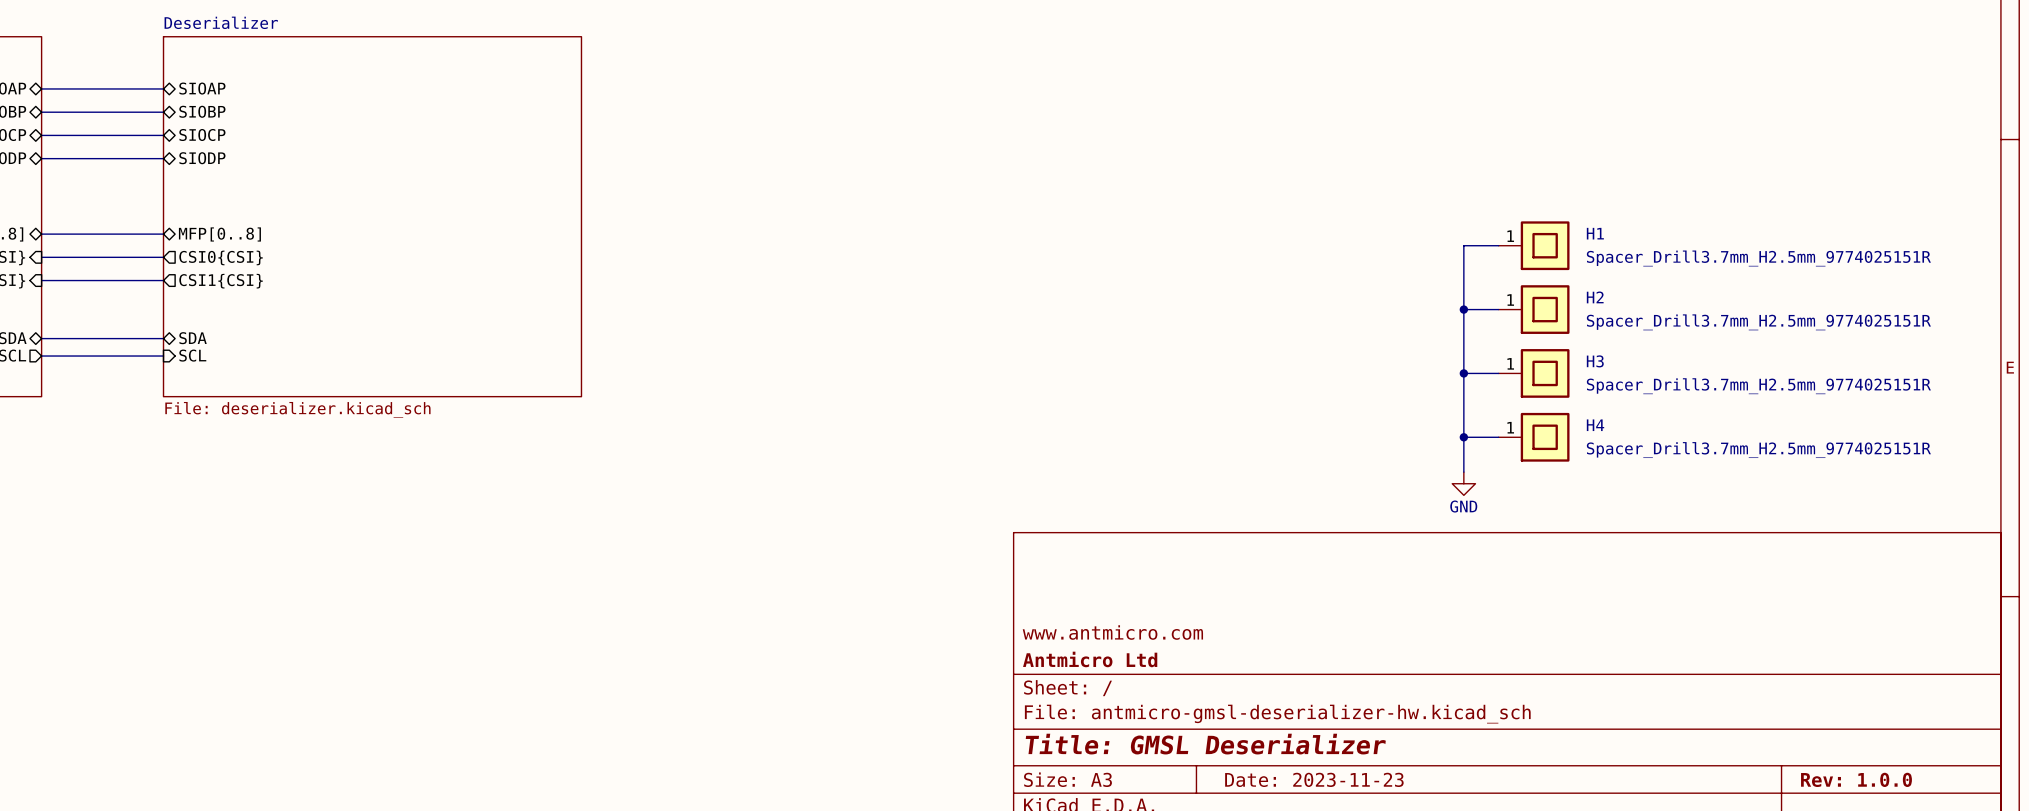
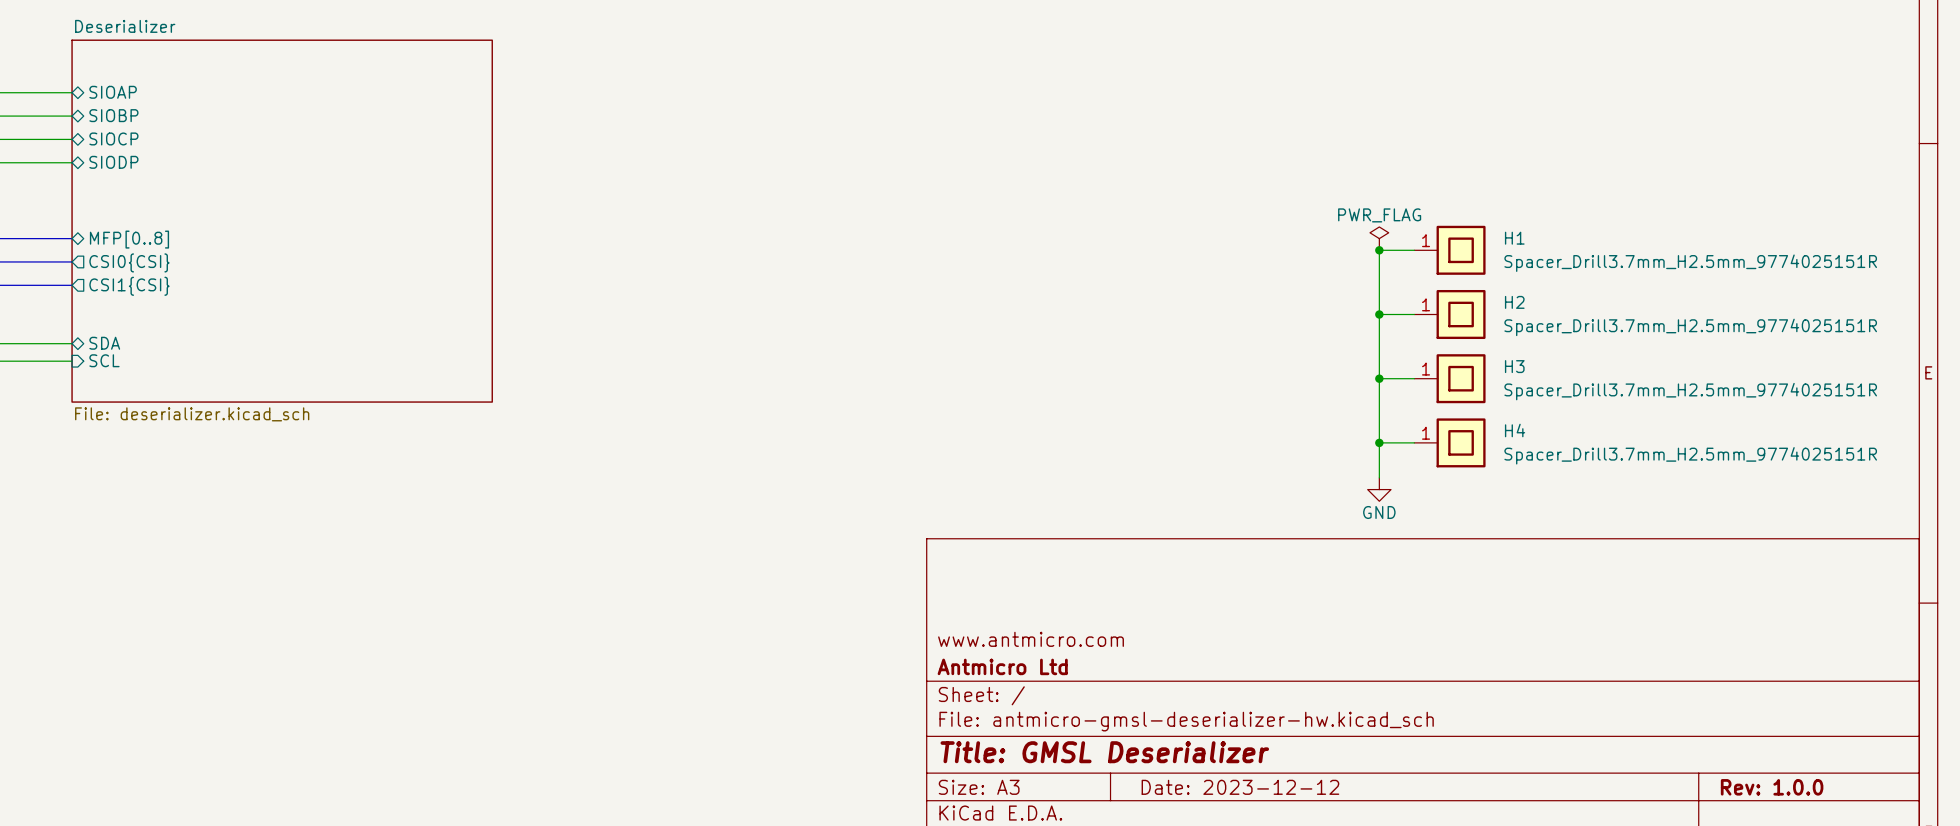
power symbol: none -> PWR_FLAG (1379, 238)
junction: none -> (1379, 250)
title block: Date: 2023-11-23 (1314, 779) -> Date: 2023-12-12 (1240, 787)

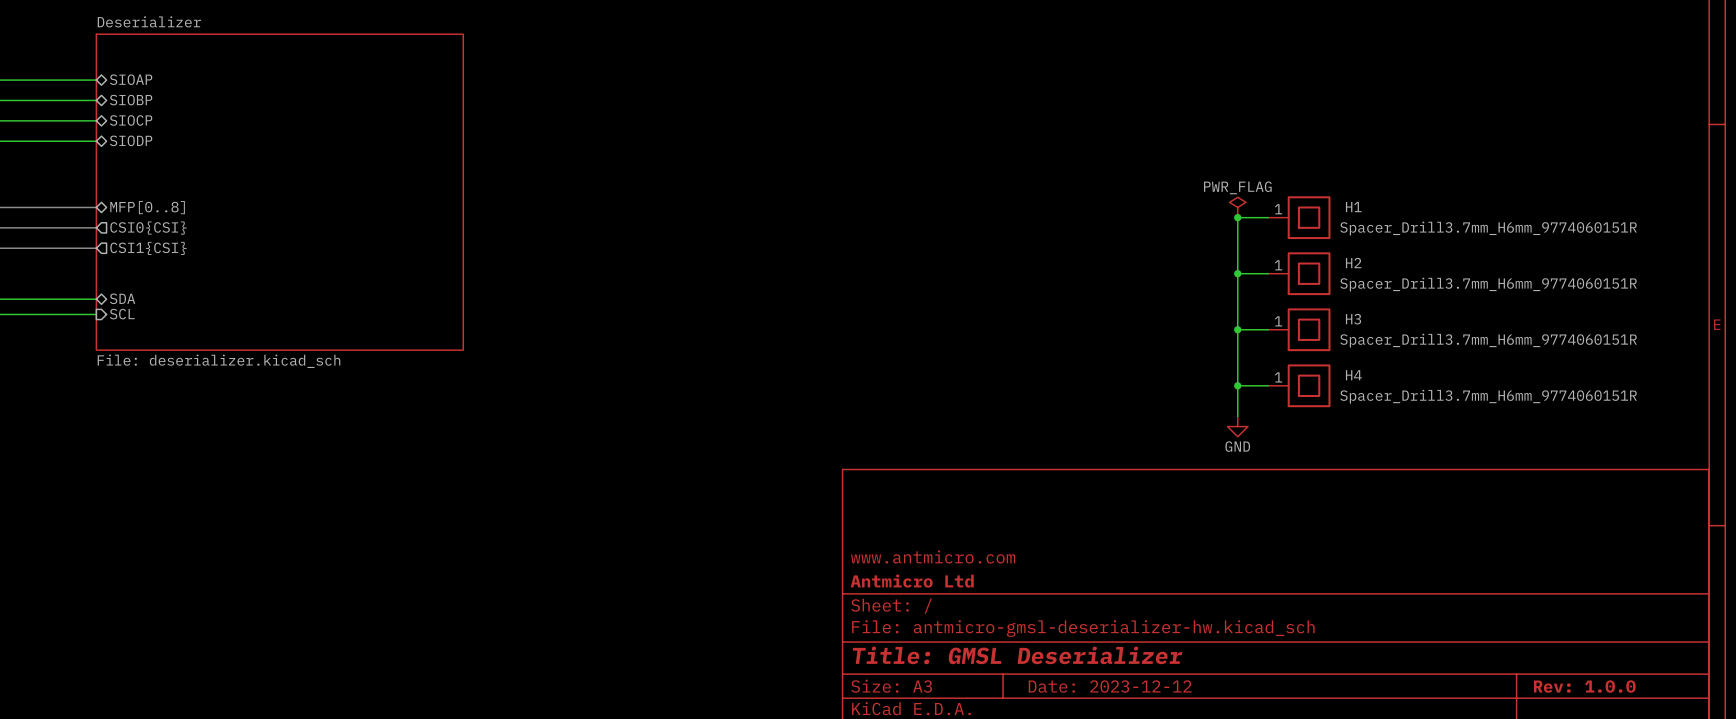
H1 value: Spacer_Drill3.7mm_H2.5mm_9774025151R (1690, 263) -> Spacer_Drill3.7mm_H6mm_9774060151R (1488, 228)
H2 value: Spacer_Drill3.7mm_H2.5mm_9774025151R (1690, 327) -> Spacer_Drill3.7mm_H6mm_9774060151R (1488, 284)
H3 value: Spacer_Drill3.7mm_H2.5mm_9774025151R (1690, 391) -> Spacer_Drill3.7mm_H6mm_9774060151R (1488, 340)
H4 value: Spacer_Drill3.7mm_H2.5mm_9774025151R (1690, 455) -> Spacer_Drill3.7mm_H6mm_9774060151R (1488, 396)

